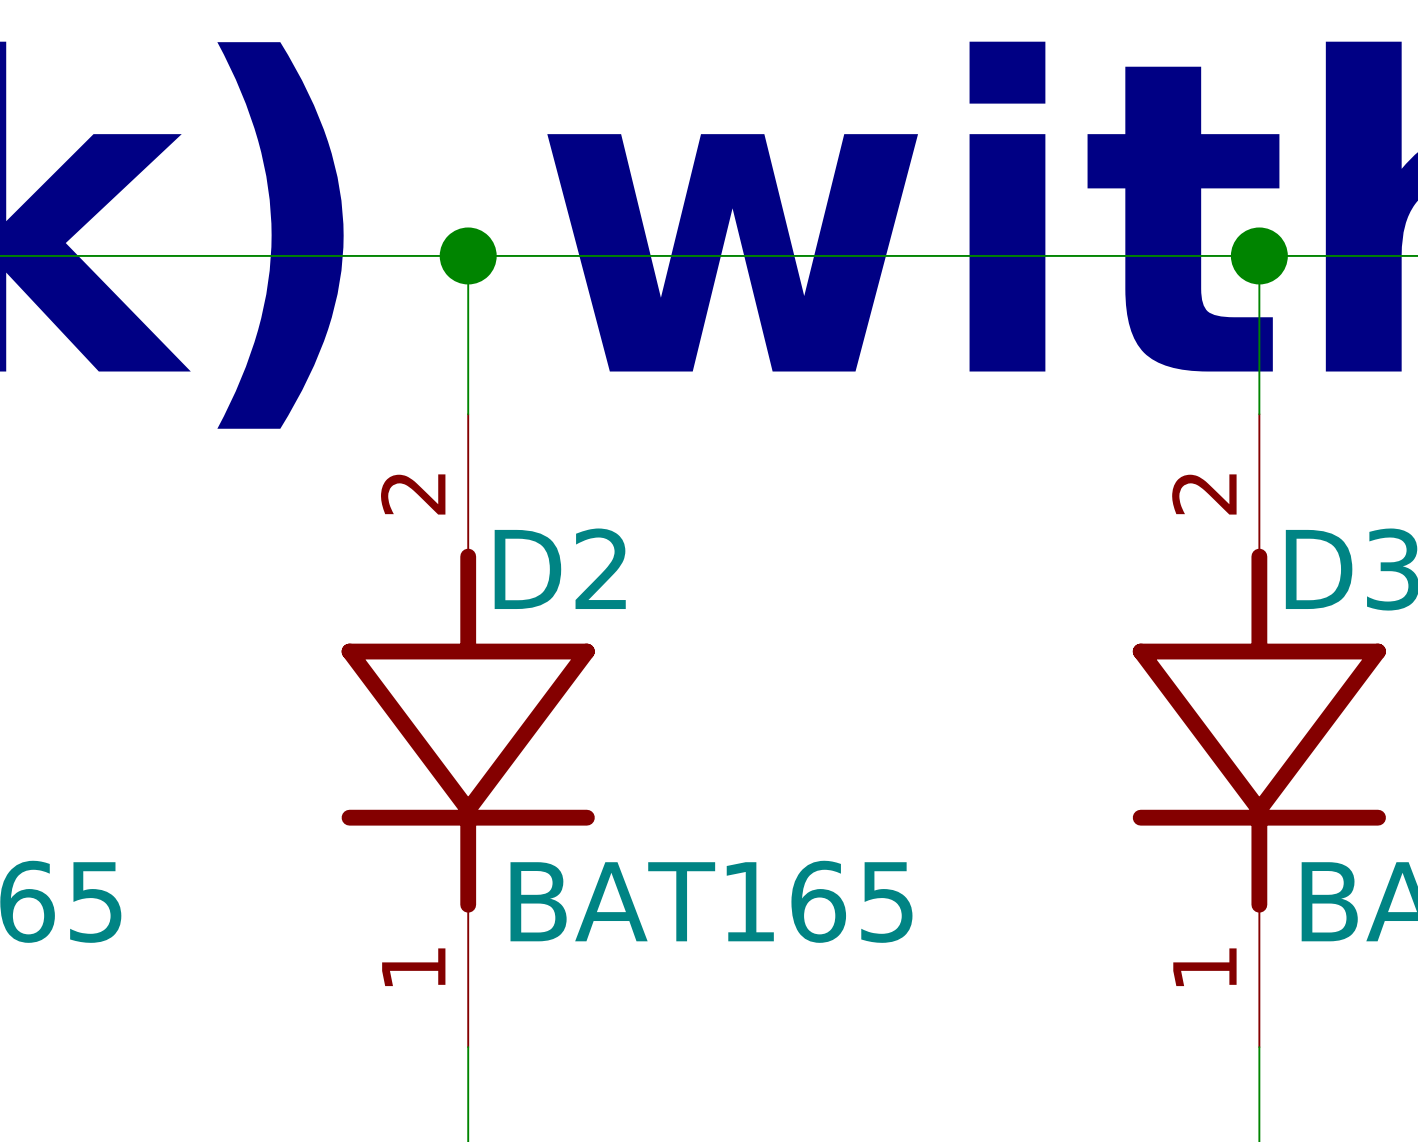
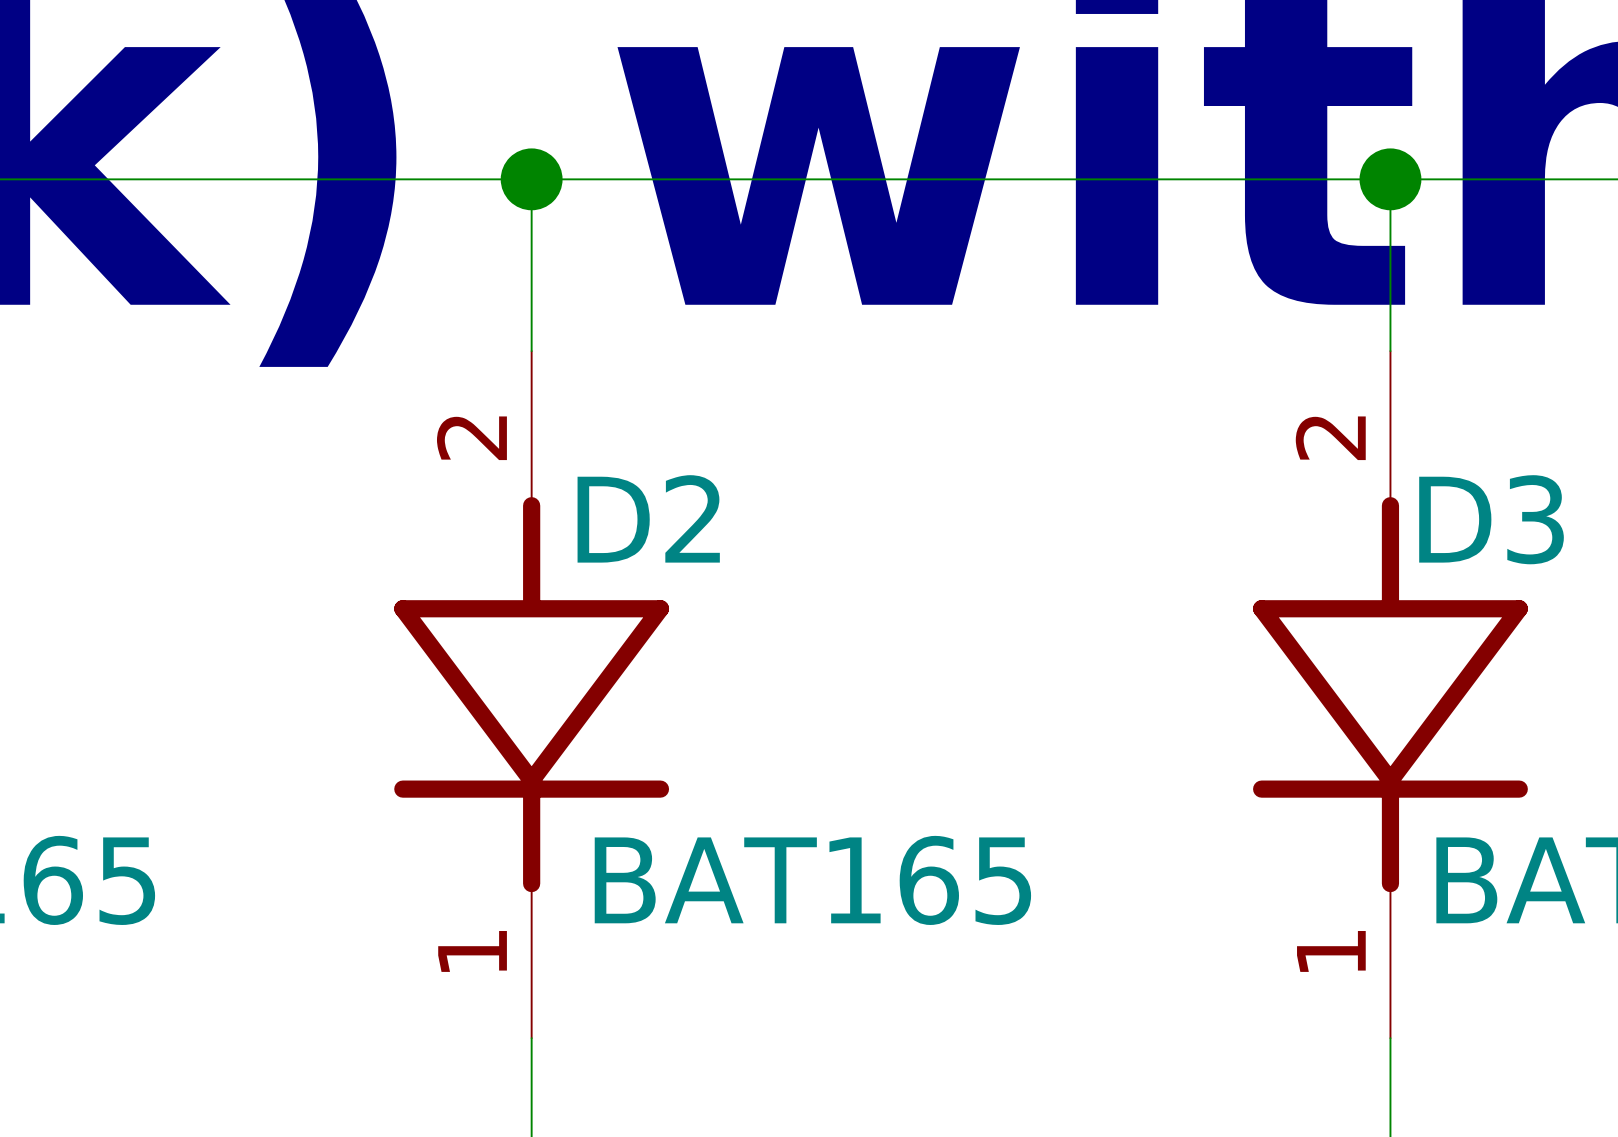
D2 name position: D2 (560, 568) -> D2 (648, 518)
D2 value position: BAT165 (711, 901) -> BAT165 (812, 880)

